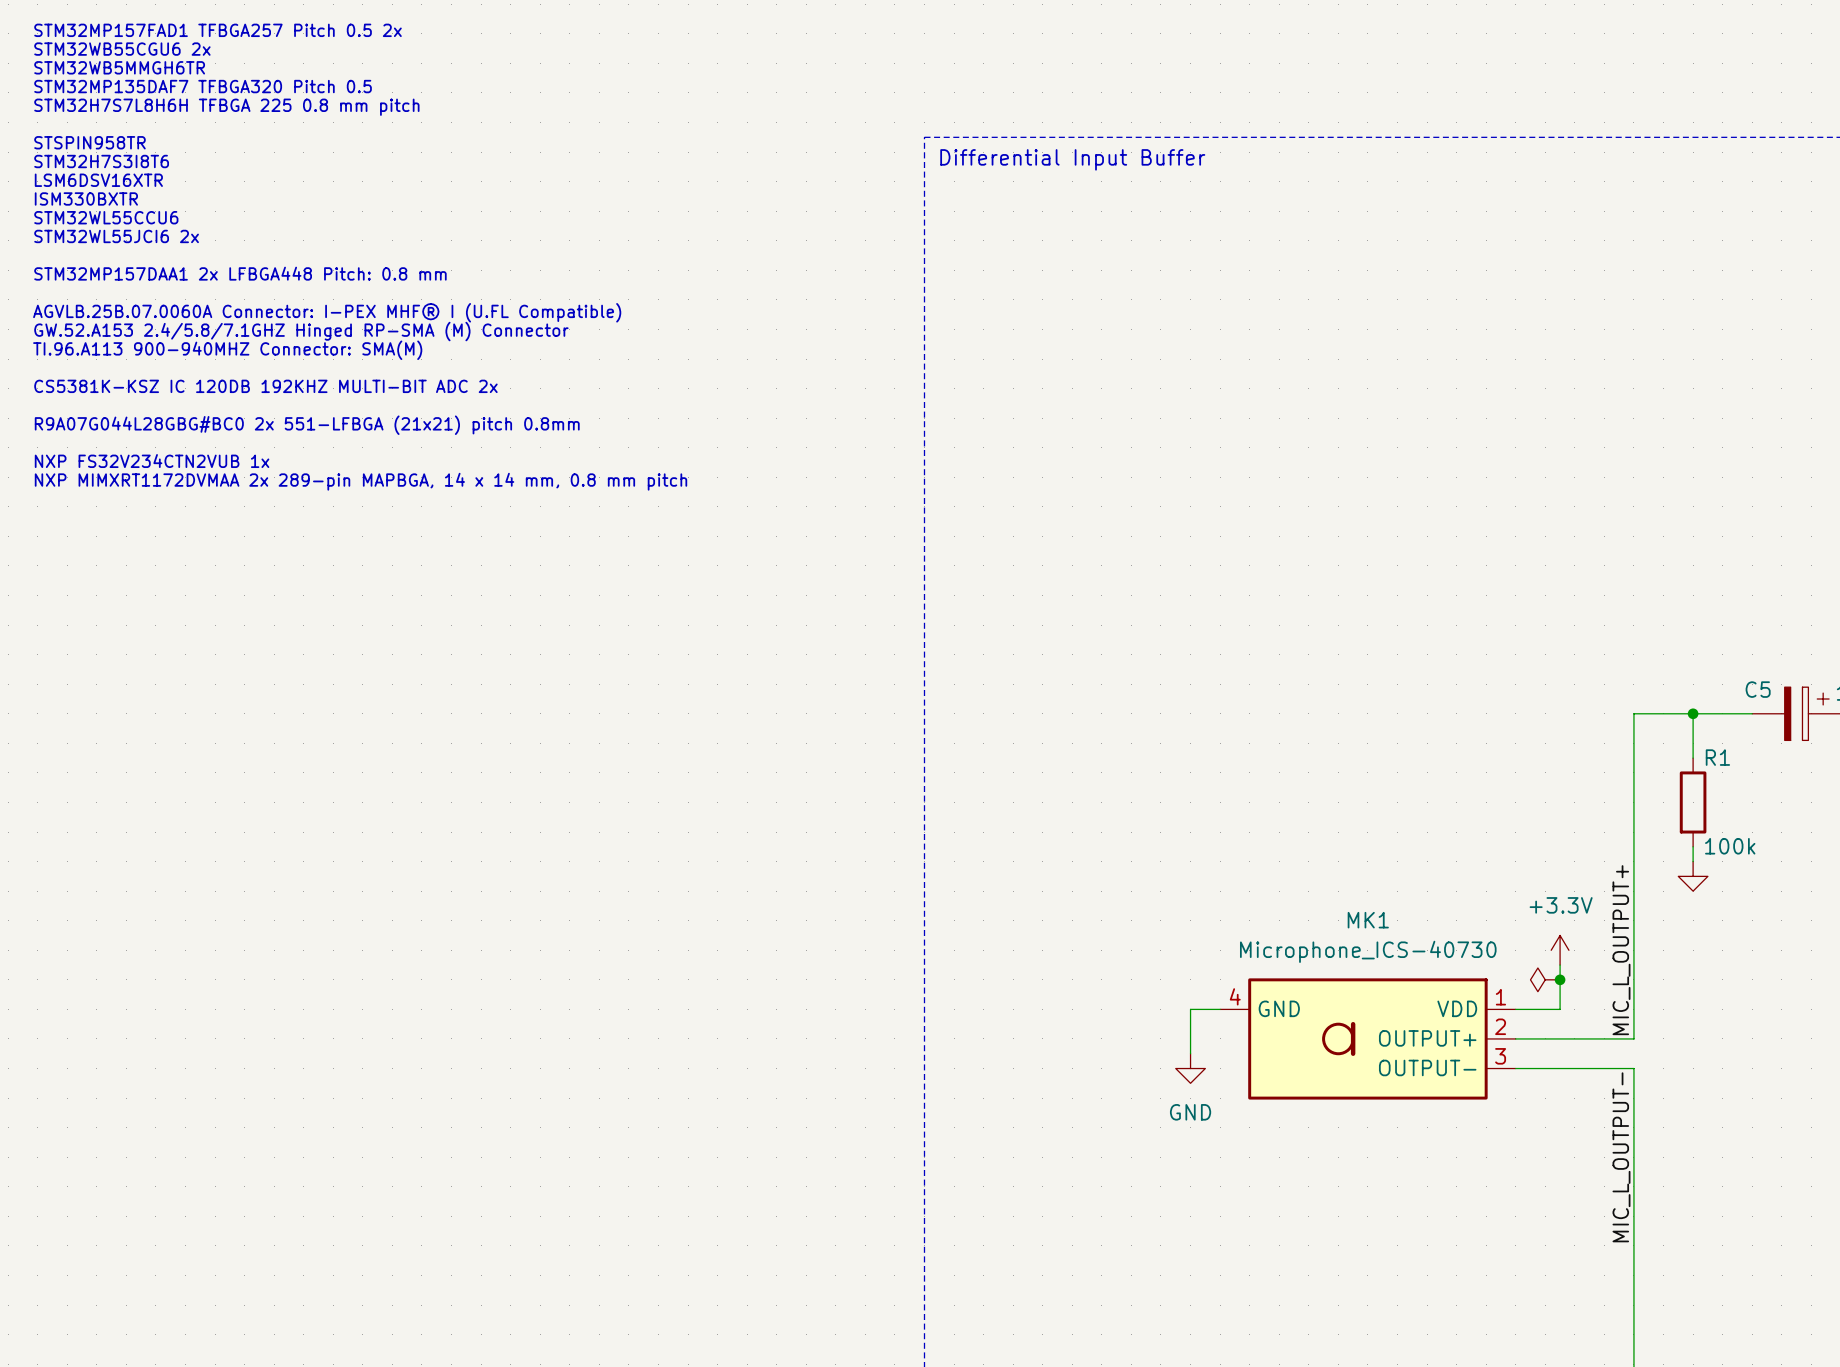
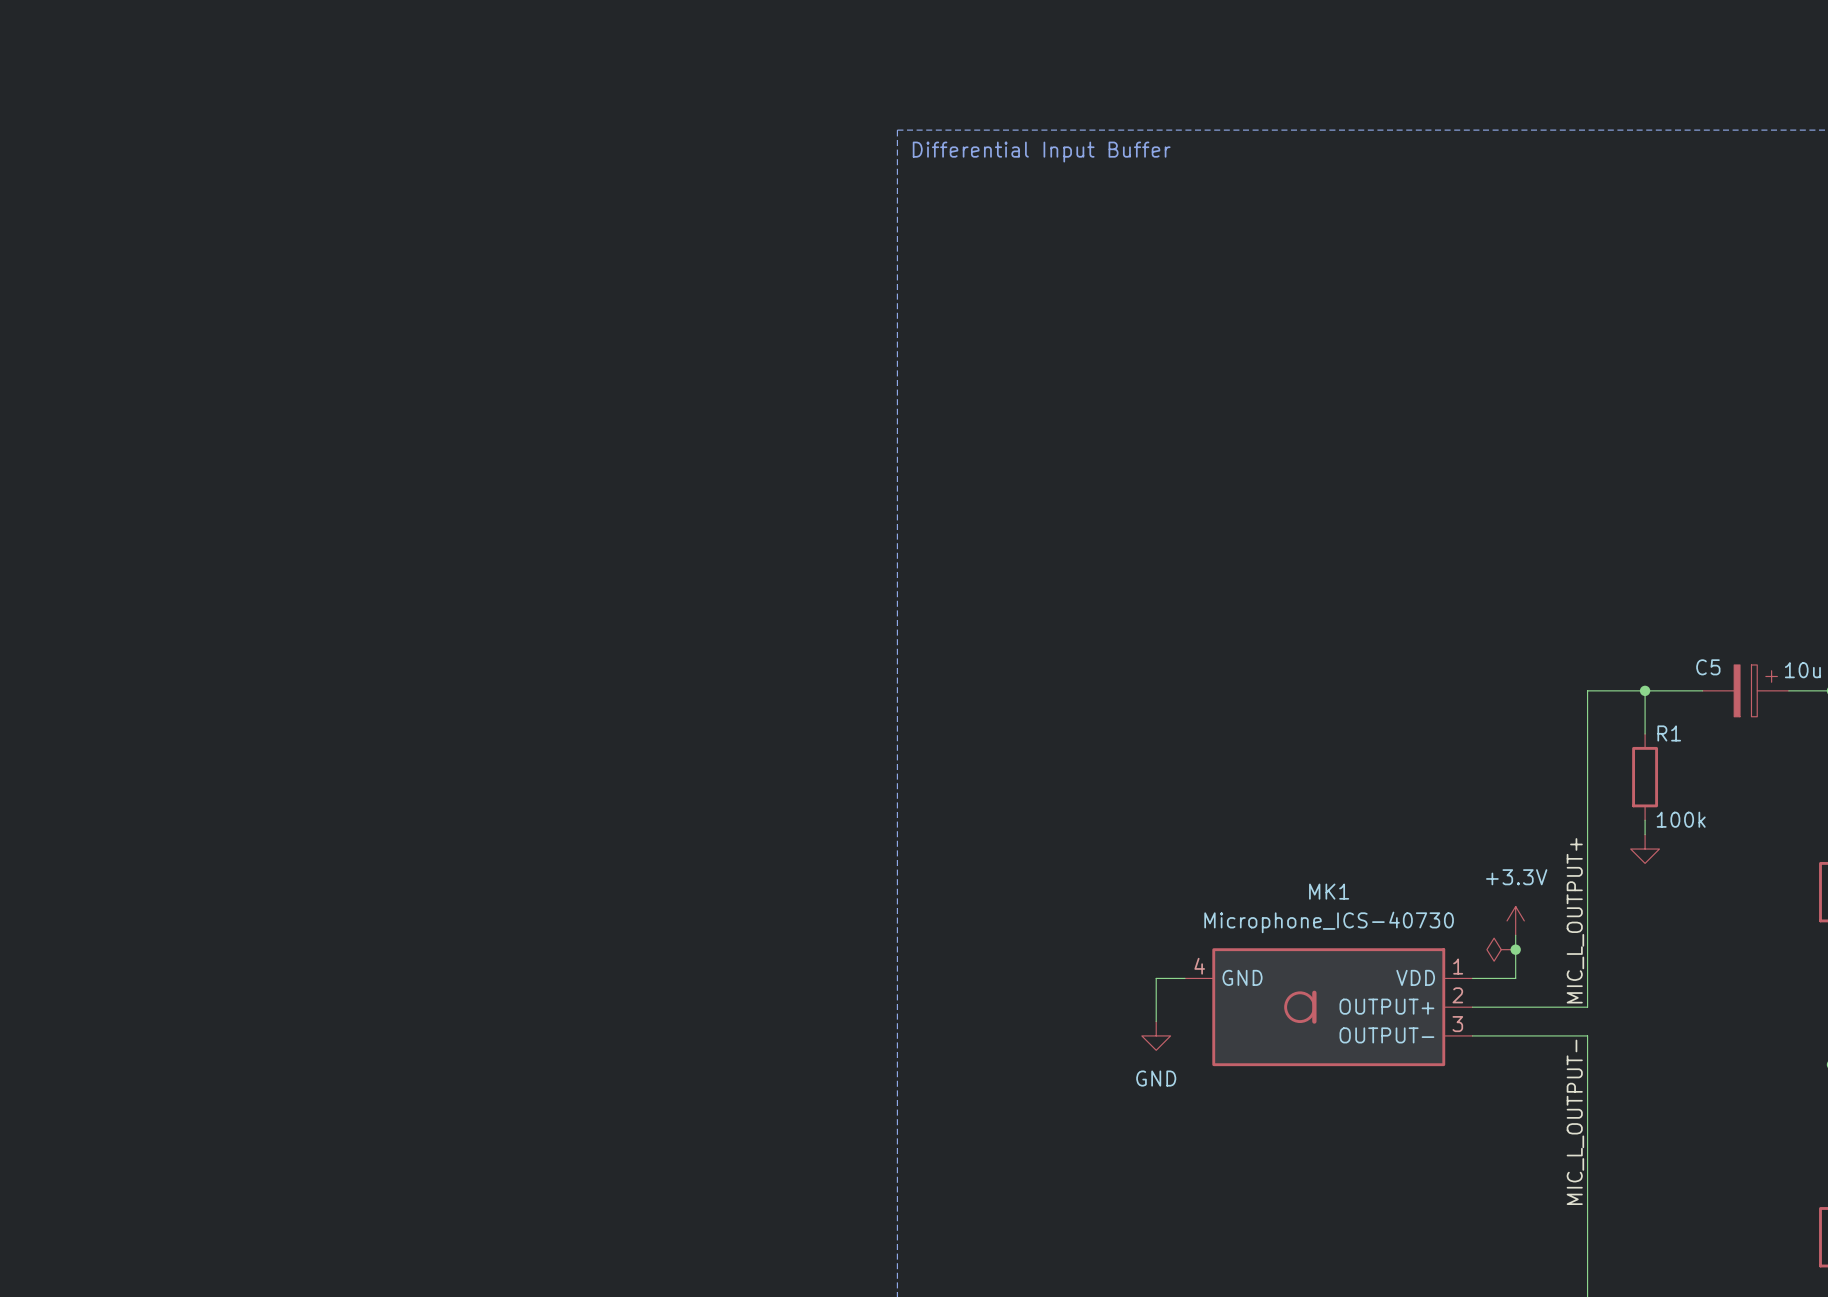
text: STM32MP157FAD1 TFBGA257 Pitch 0.5 2x (218, 30) -> none
text: STM32WB55CGU6 2x (122, 49) -> none
text: STM32WB5MMGH6TR (119, 67) -> none
text: STM32MP135DAF7 TFBGA320 Pitch 0.5 (203, 86) -> none
text: STM32H7S7L8H6H TFBGA 225 0.8 mm pitch (226, 107) -> none
text: STSPIN958TR (89, 142) -> none
text: STM32H7S3I8T6 (101, 161) -> none
text: LSM6DSV16XTR (98, 180) -> none
text: ISM330BXTR (86, 198) -> none
text: STM32WL55CCU6 (106, 217) -> none
text: STM32WL55JCI6 2x (116, 236) -> none
text: STM32MP157DAA1 2x LFBGA448 Pitch: 0.8 mm (240, 273) -> none
text: AGVLB.25B.07.0060A Connector: I-PEX MHF® I (U.FL Compatible) (327, 312) -> none
text: GW.52.A153 2.4/5.8/7.1GHZ Hinged RP-SMA (M) Connector (301, 331) -> none
text: TI.96.A113 900-940MHZ Connector: SMA(M) (227, 350) -> none
text: CS5381K-KSZ IC 120DB 192KHZ MULTI-BIT ADC 2x (265, 386) -> none
text: R9A07G044L28GBG#BC0 2x 551-LFBGA (21x21) pitch 0.8mm (307, 425) -> none
text: NXP FS32V234CTN2VUB 1x (152, 461) -> none
text: NXP MIMXRT1172DVMAA 2x 289-pin MAPBGA, 14 x 14 mm, 0.8 mm pitch (360, 481) -> none

